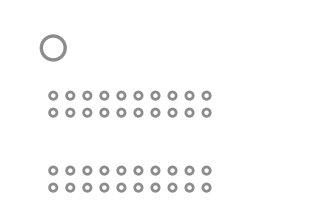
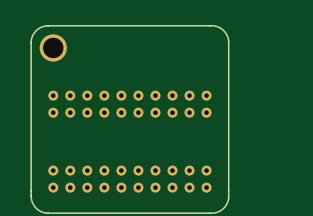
board edge: none -> (209, 25) (48, 25) (36, 30) (31, 42) (31, 196) (36, 208) (48, 213) (212, 213) (224, 207) (228, 197) (228, 41) (222, 29) (209, 25)

